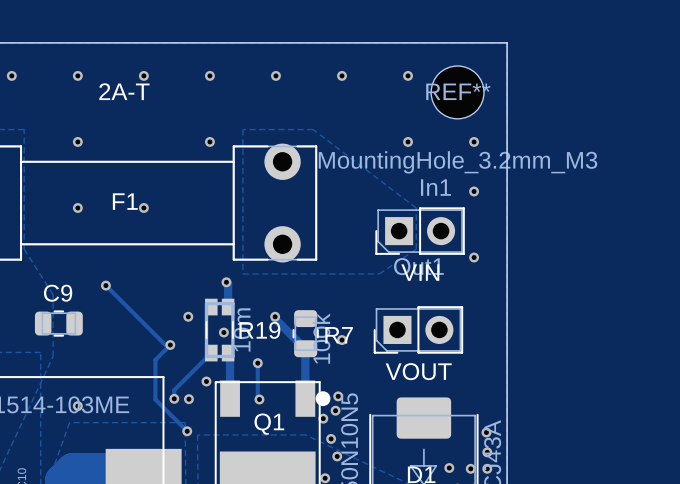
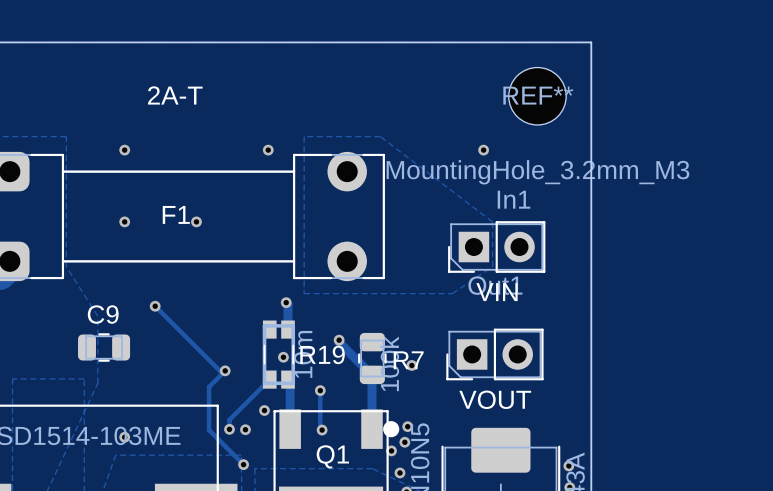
via: (11, 75) -> none
via: (77, 75) -> none
via: (143, 75) -> none
via: (209, 75) -> none
via: (275, 75) -> none
via: (342, 75) -> none
via: (408, 75) -> none
via: (474, 141) -> none
via: (474, 191) -> none
via: (474, 257) -> none
via: (188, 316) -> none

